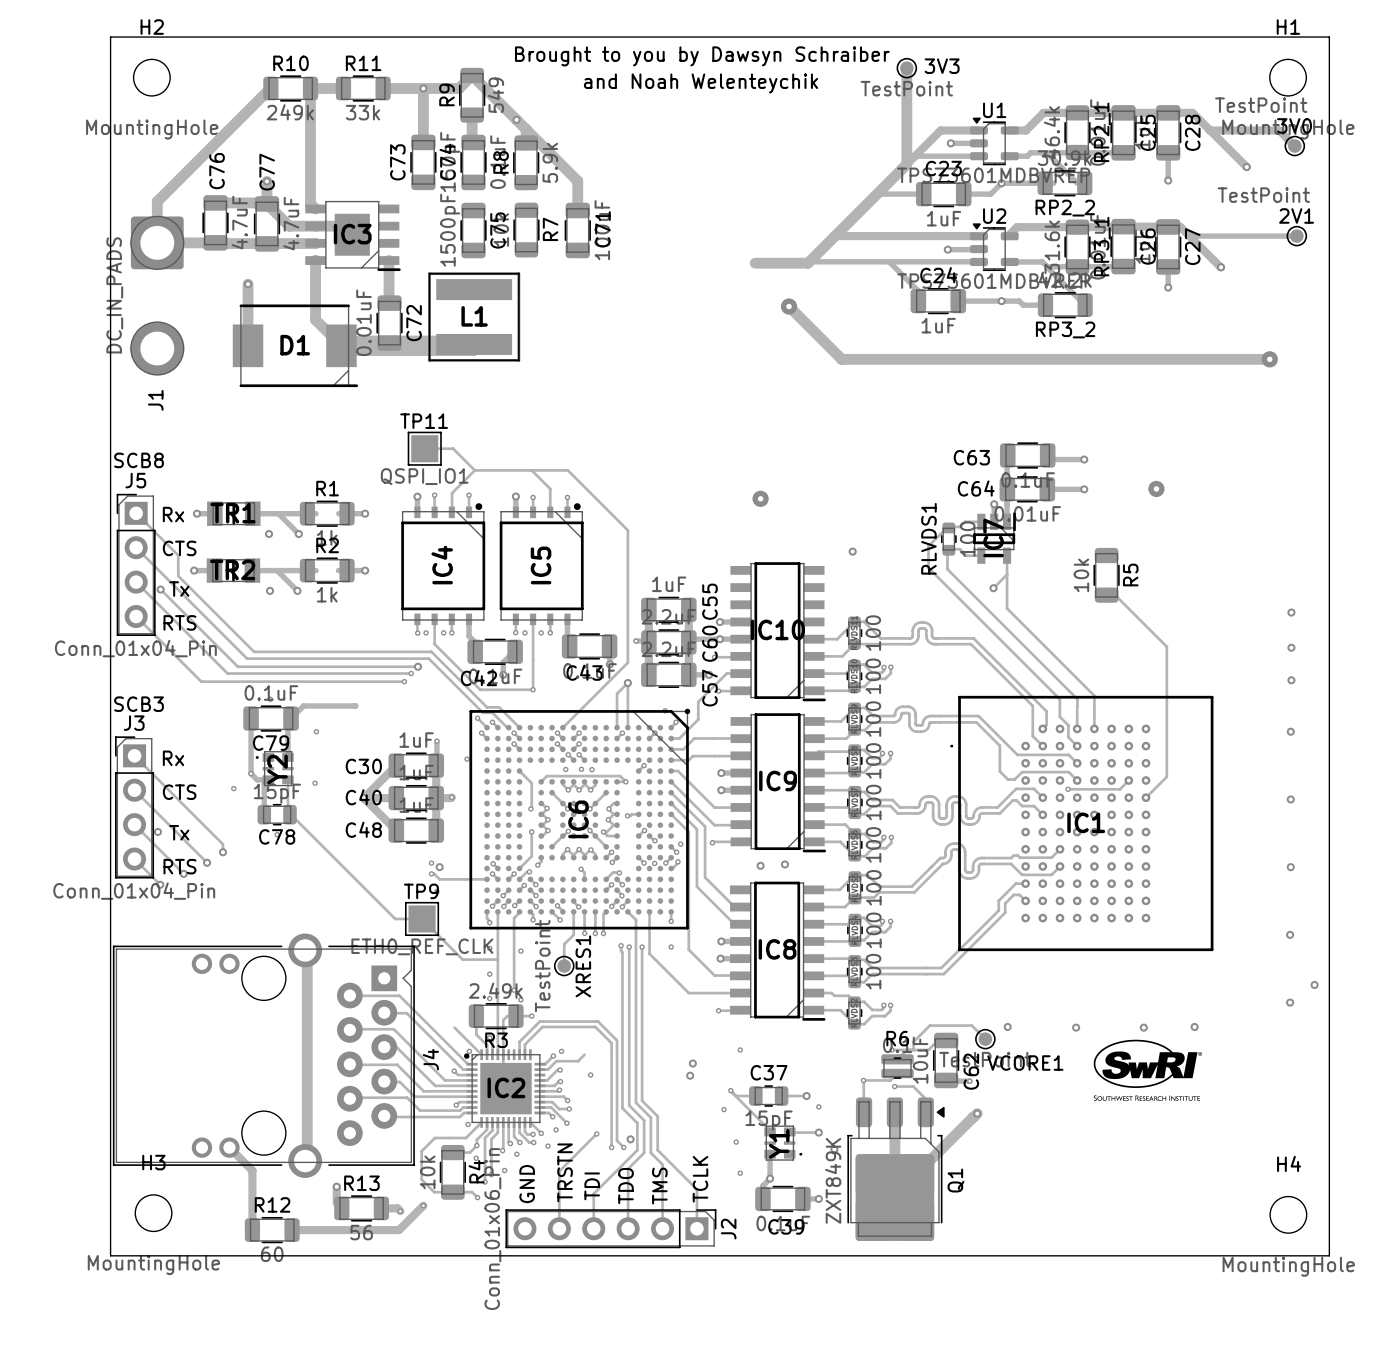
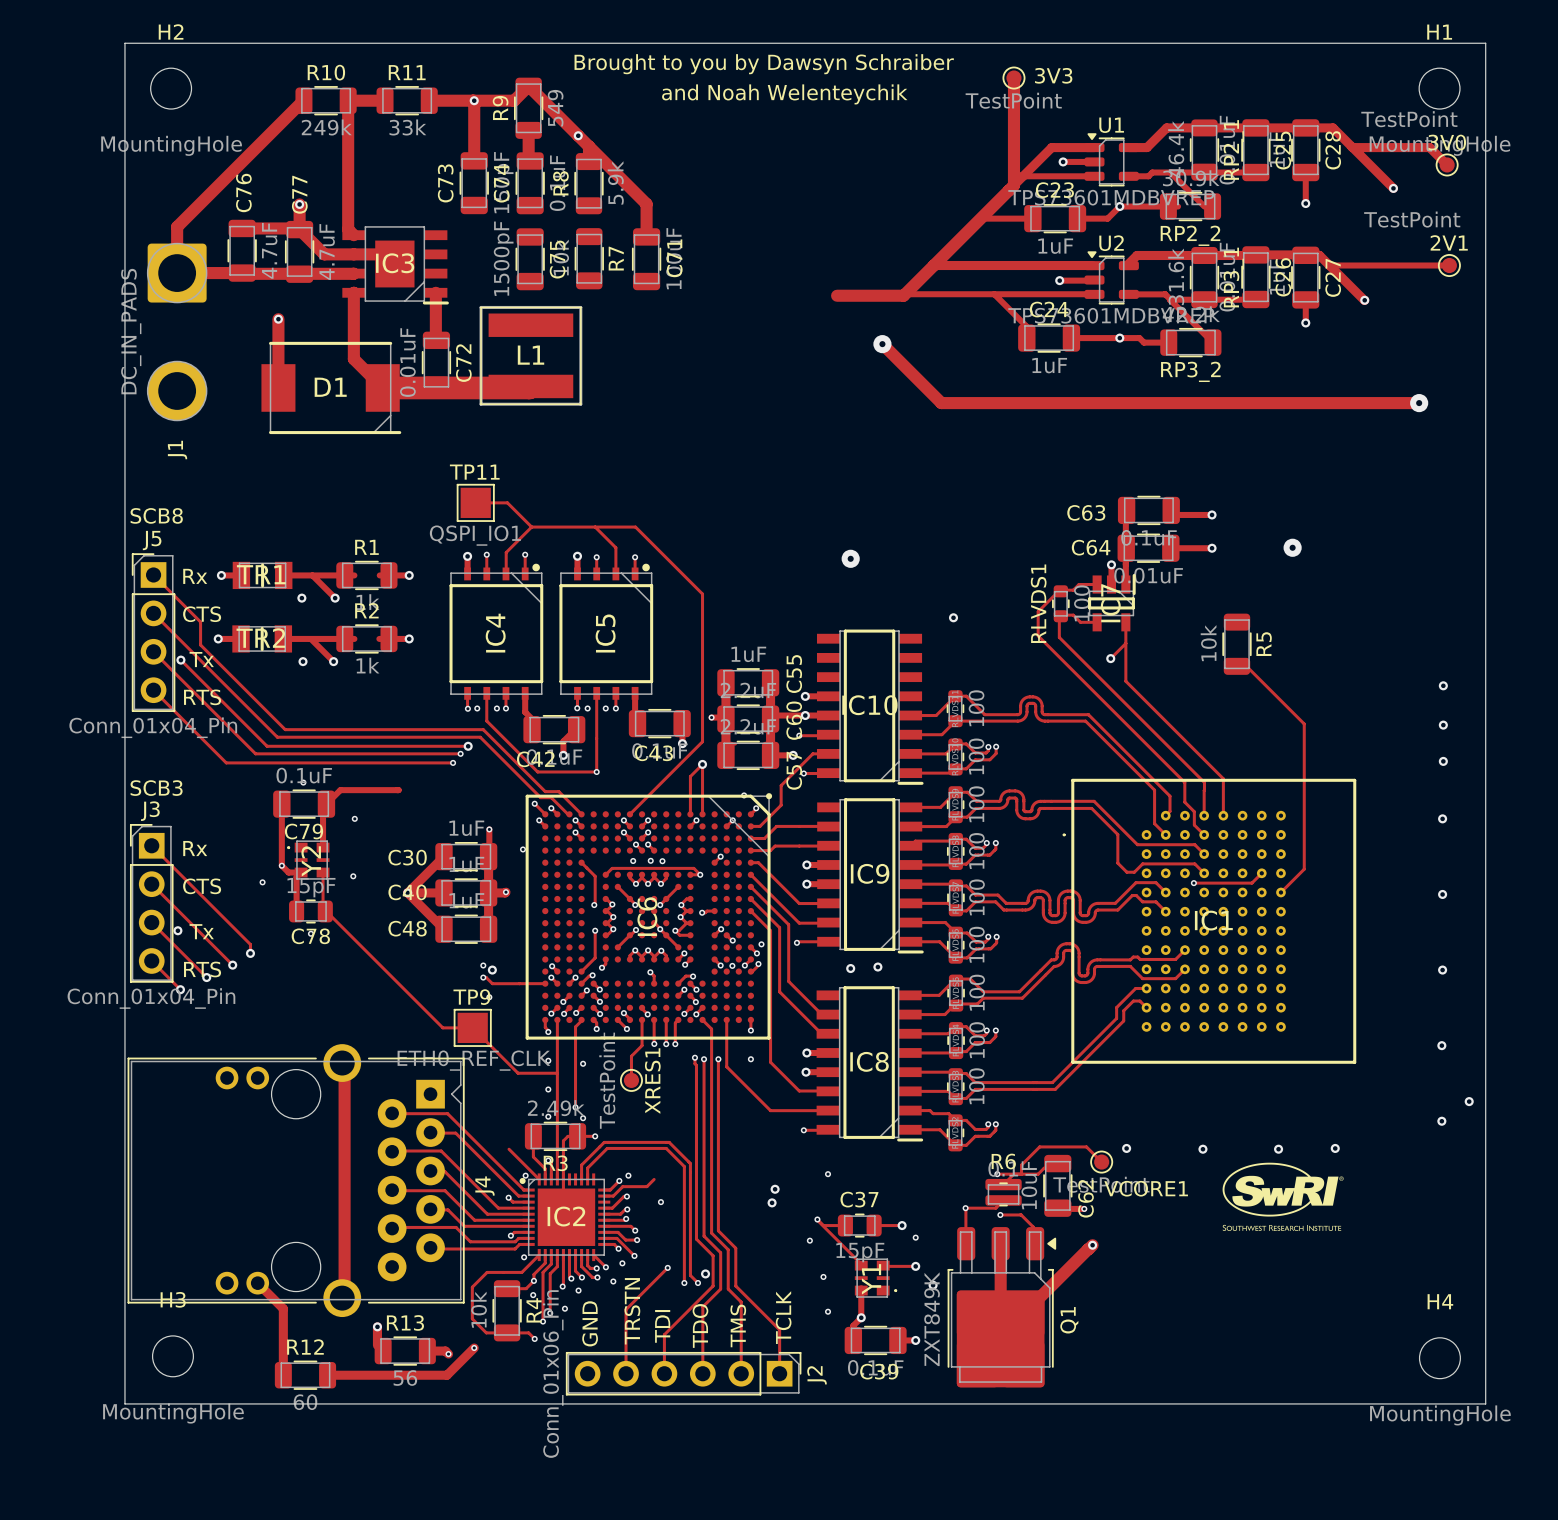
track: none -> (837, 295) (844, 295)

